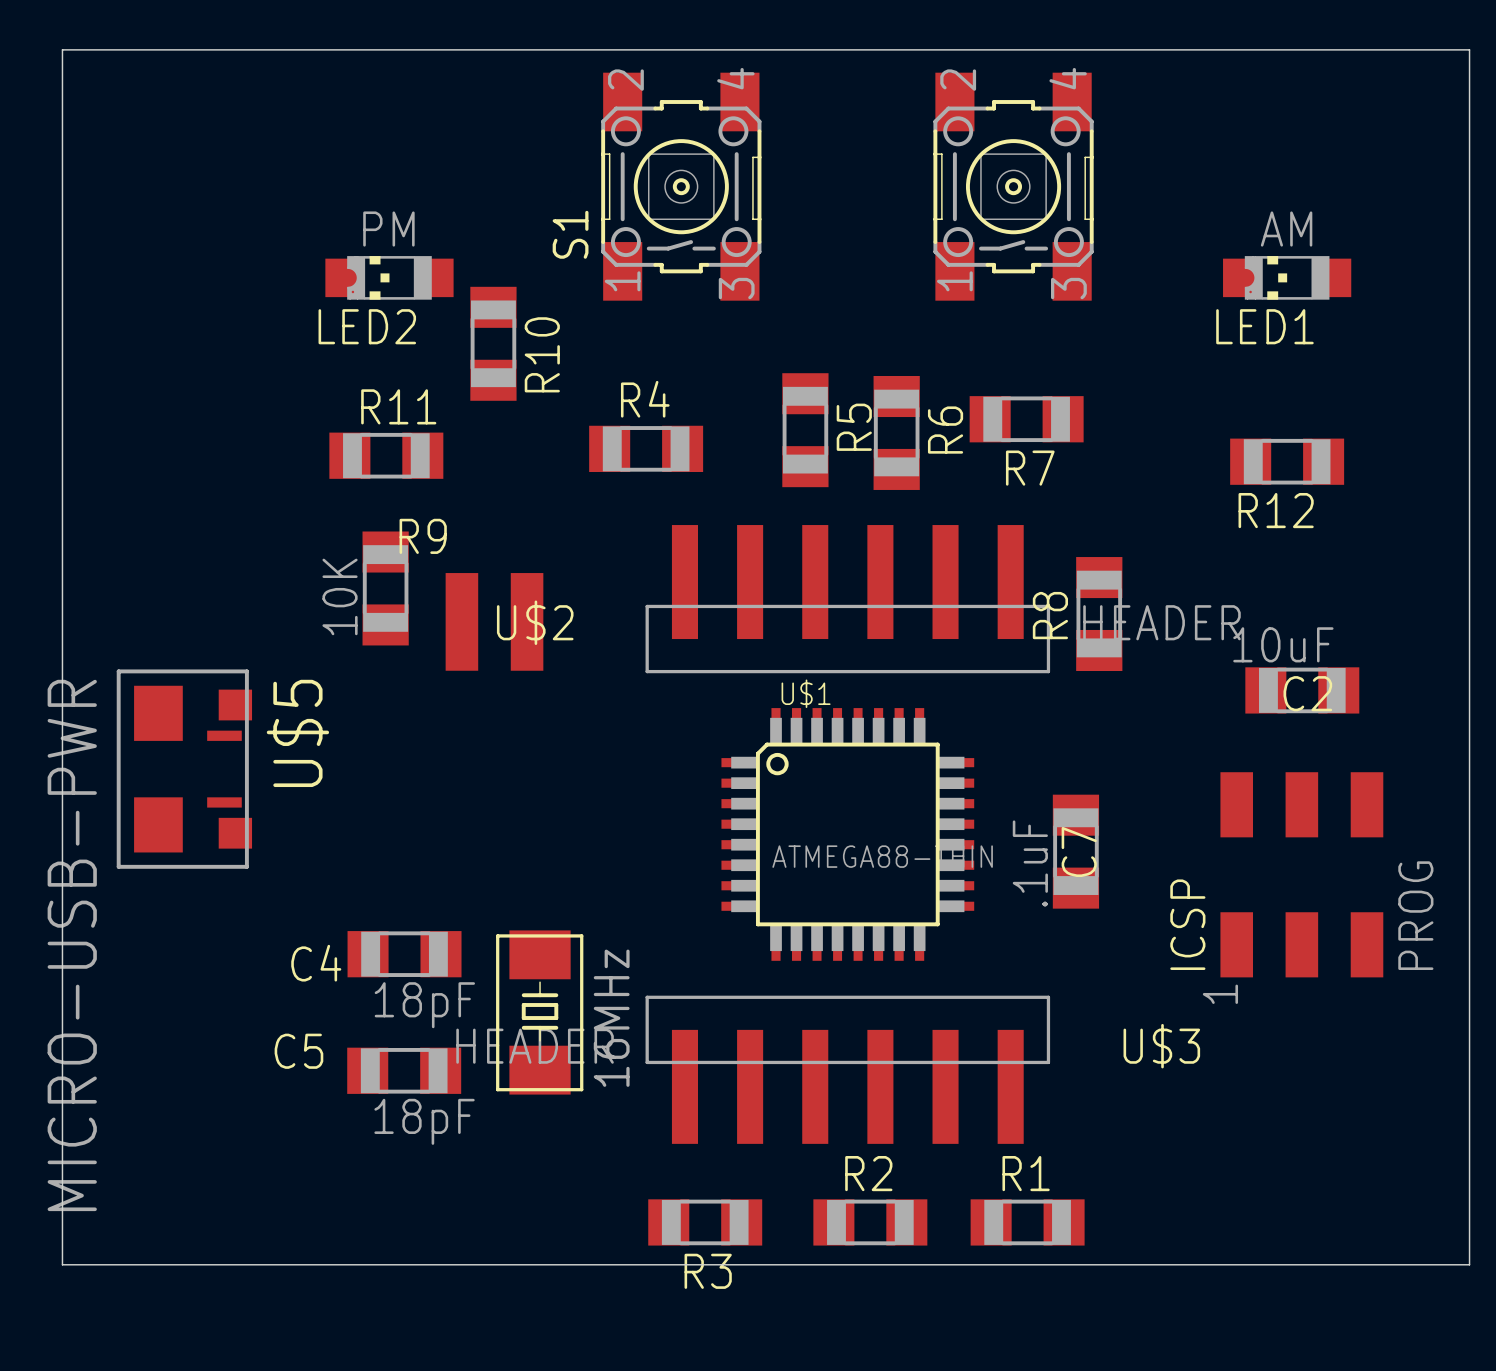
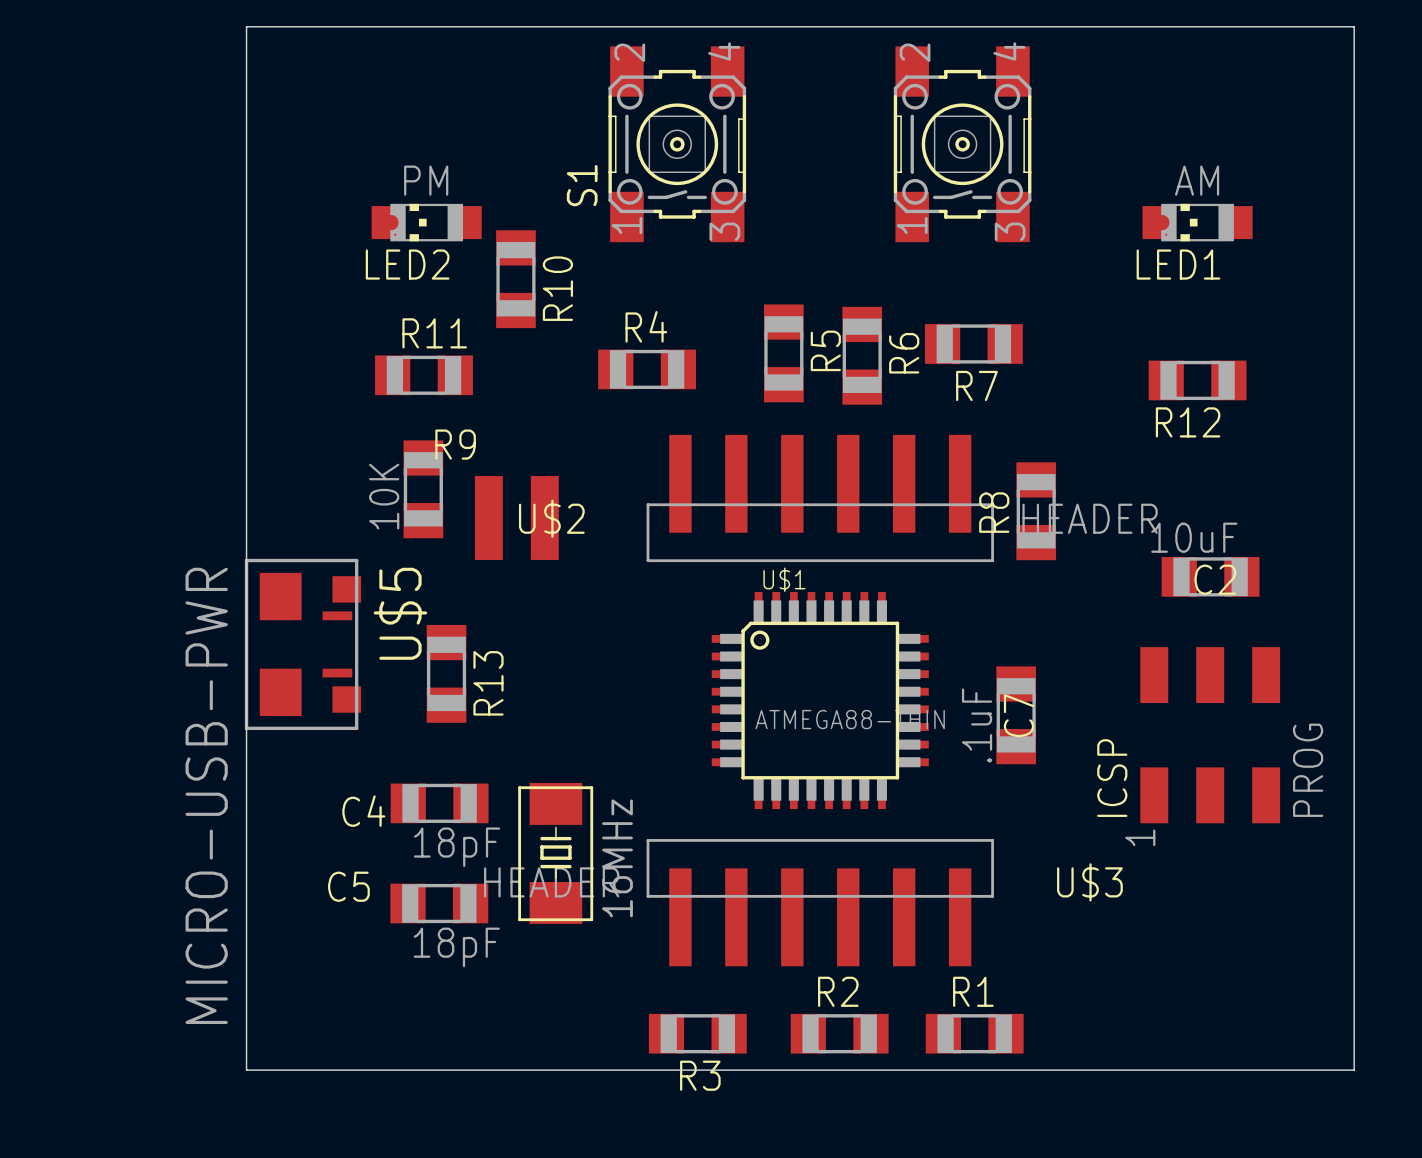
board edge: (179, 49) (62, 49) (62, 1264) (179, 1264) -> (246, 26) (246, 1070)
U$5 position: (184, 769) -> (302, 644)
R13: none -> (446, 673)

